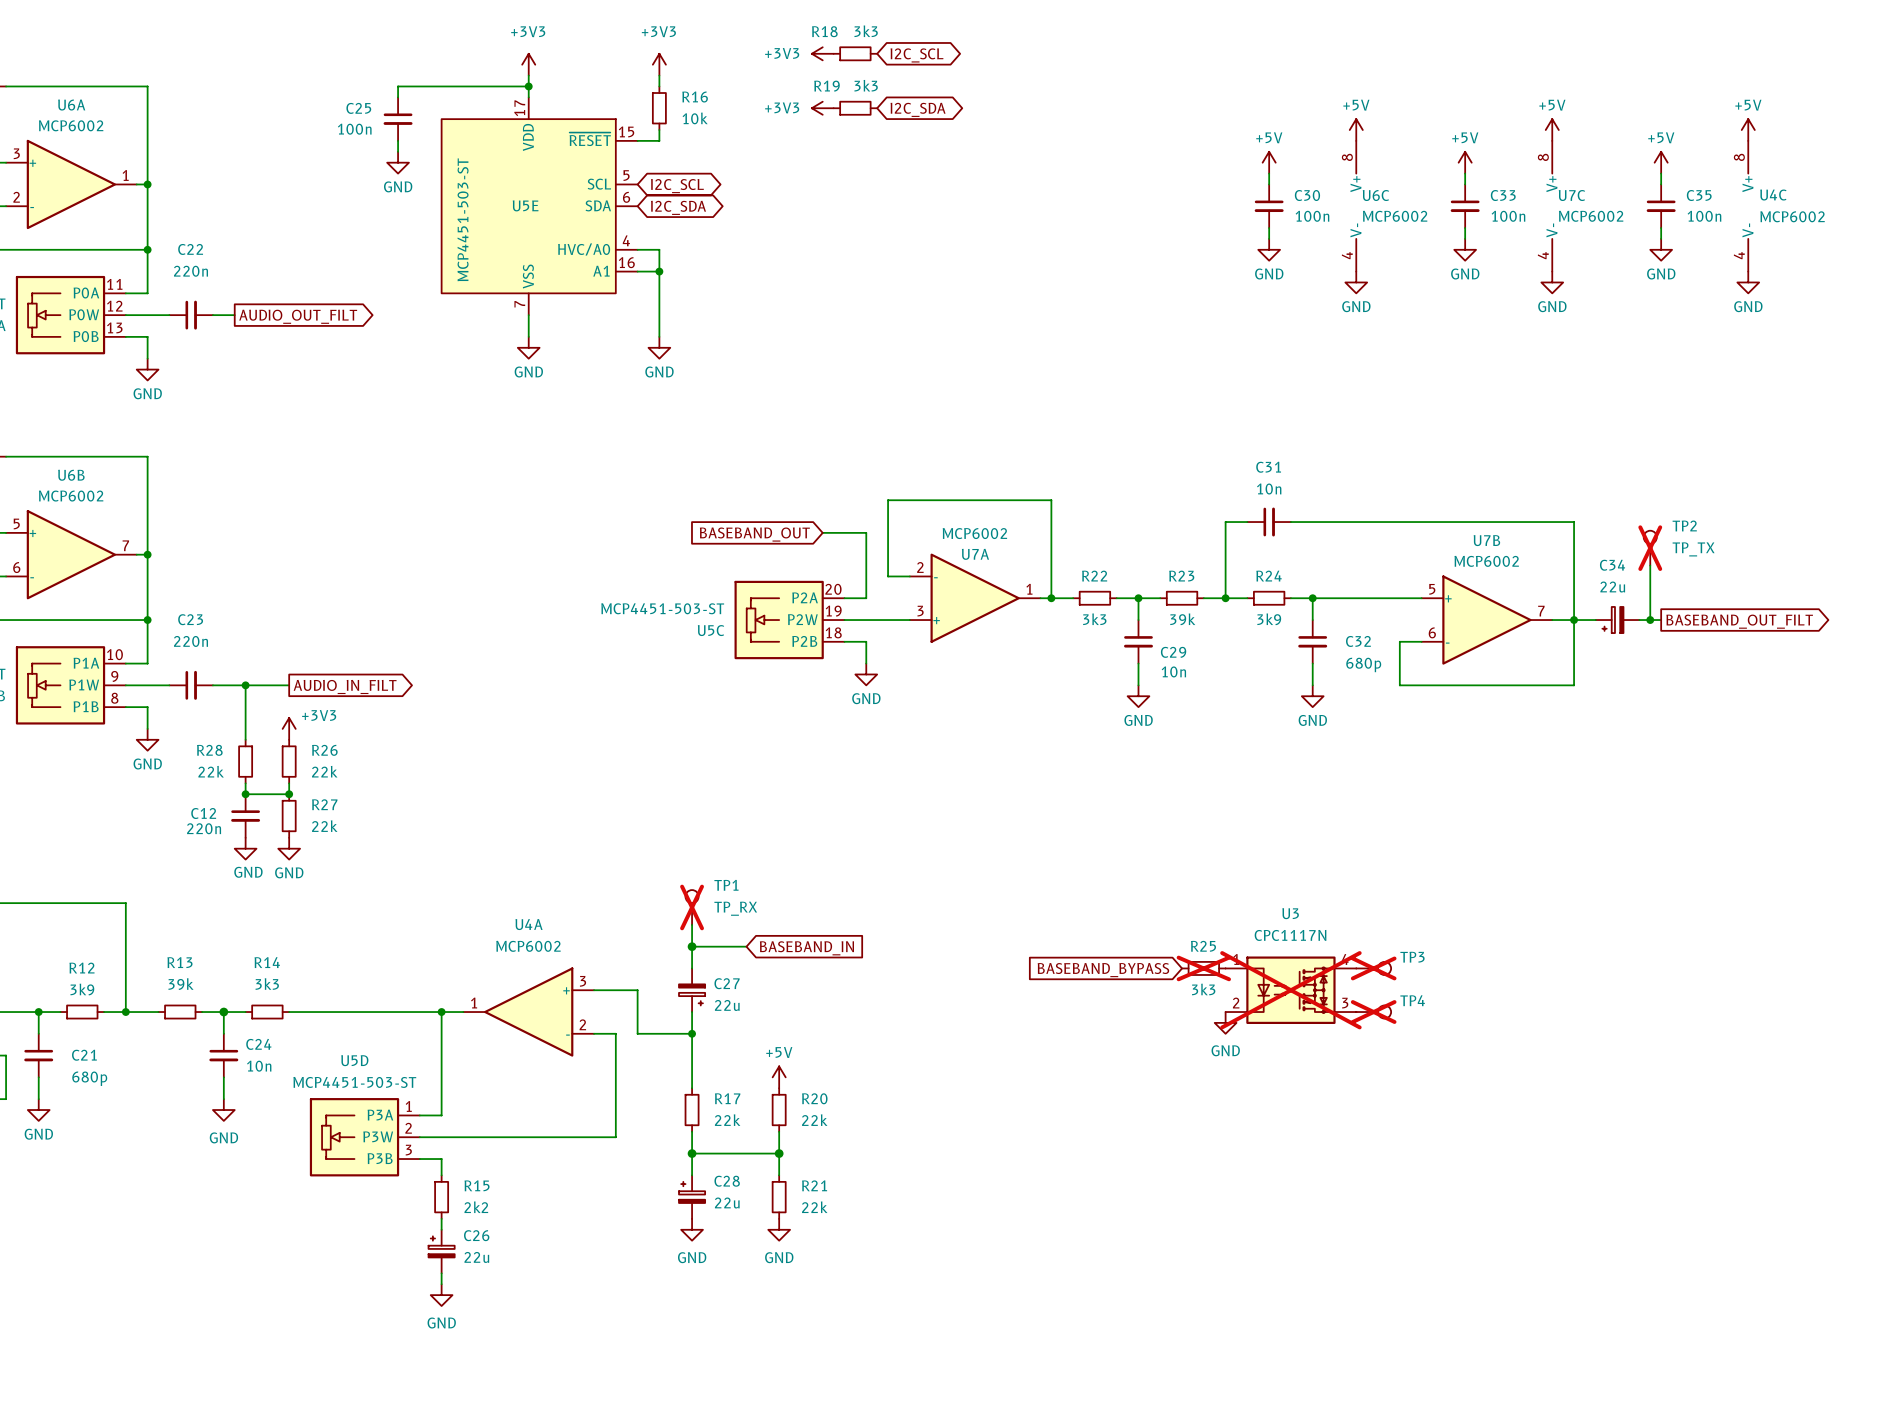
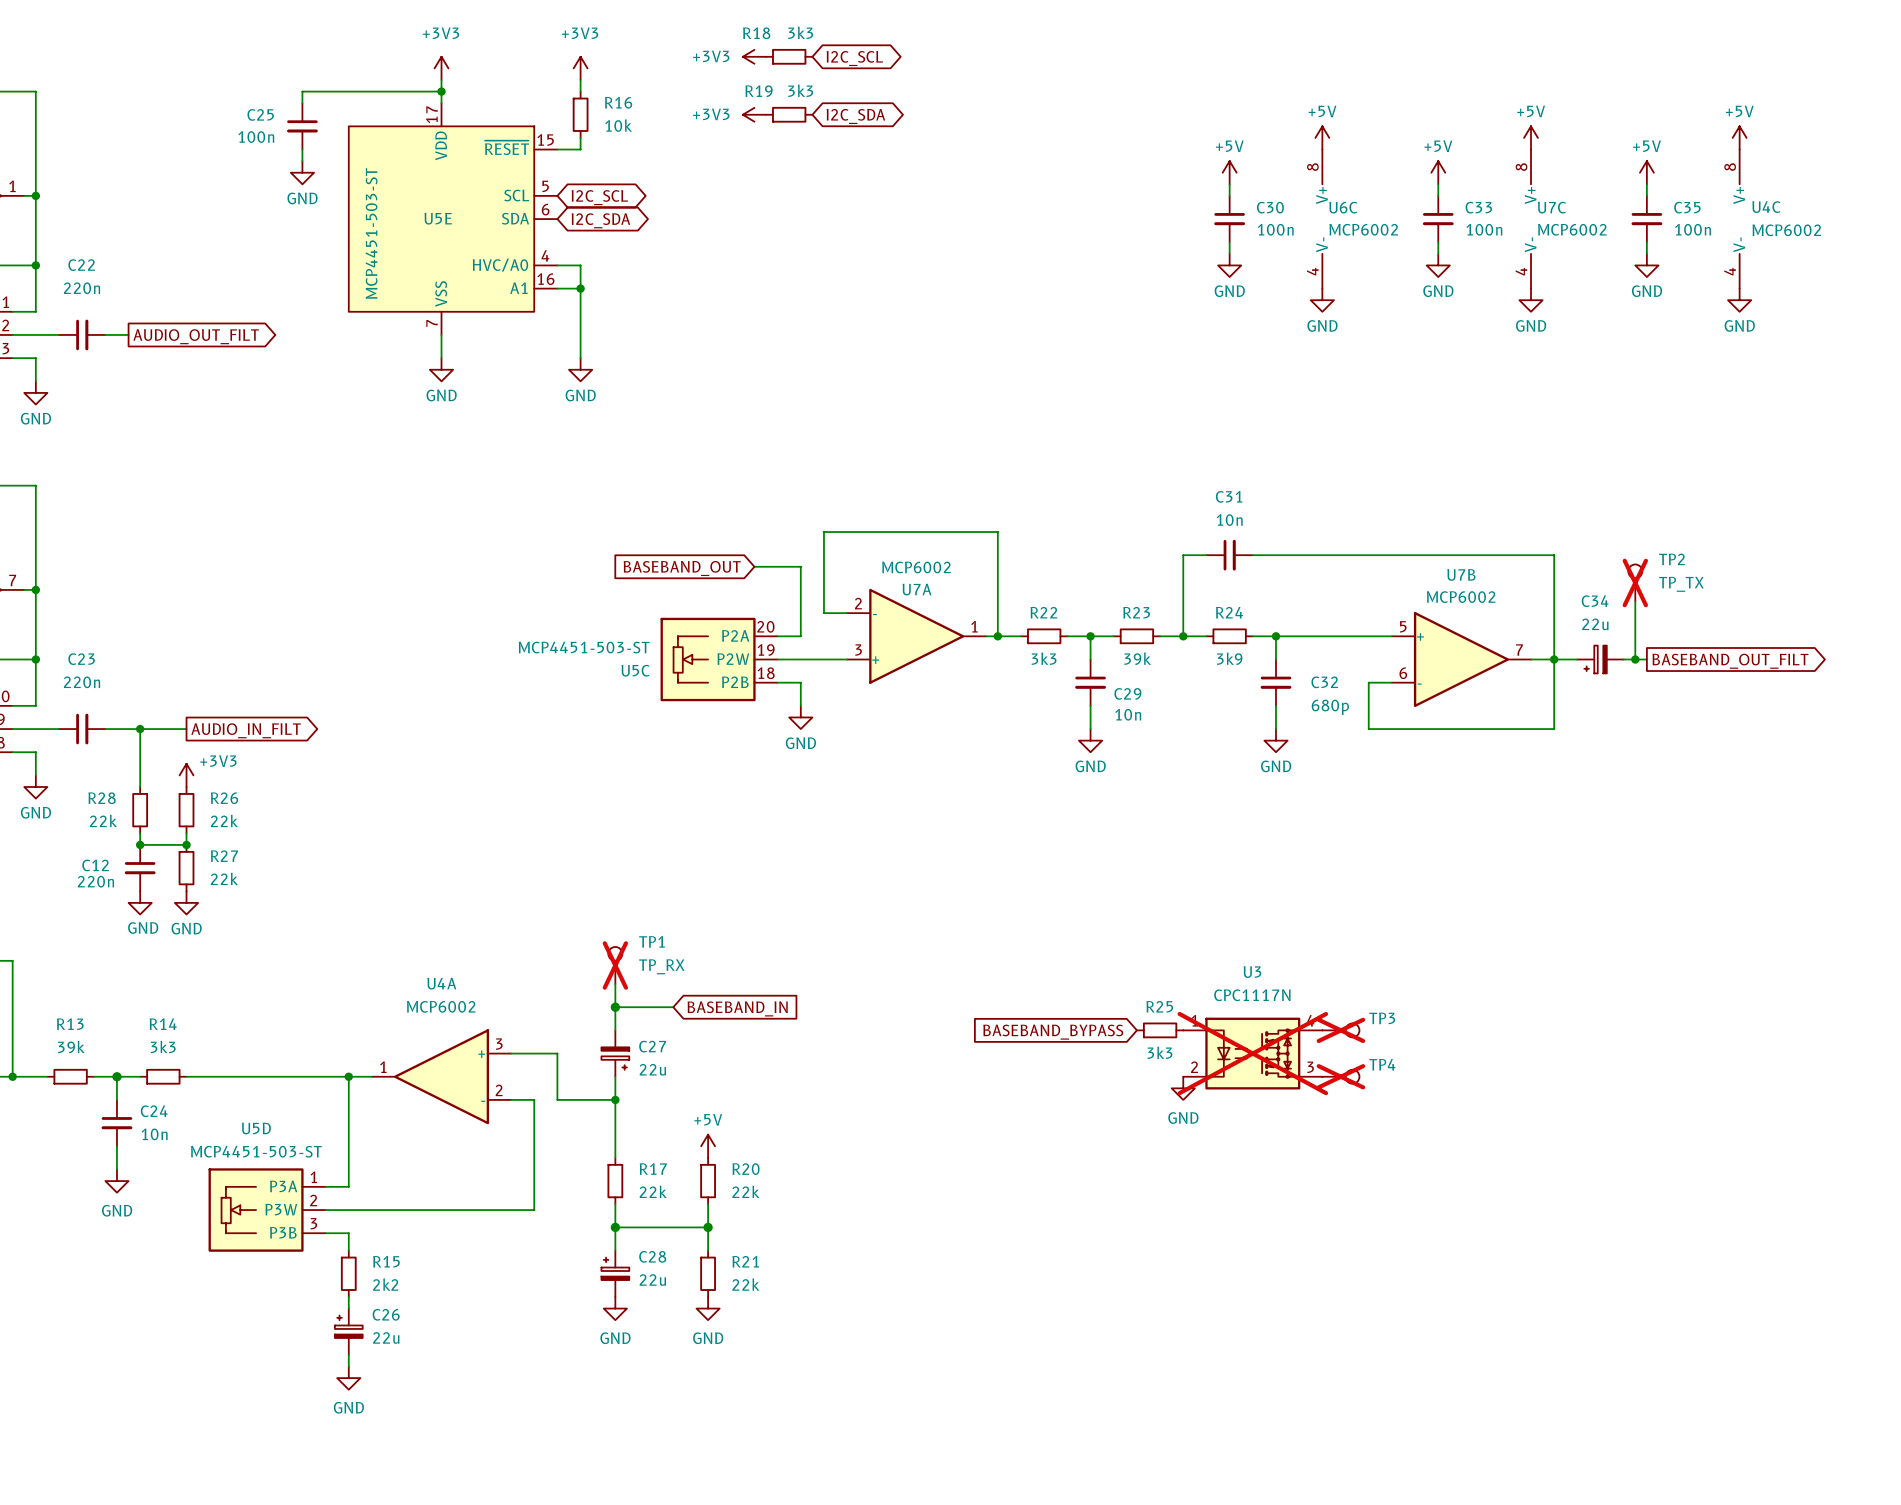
R25 do-not-place cross: (1203, 968) -> none

